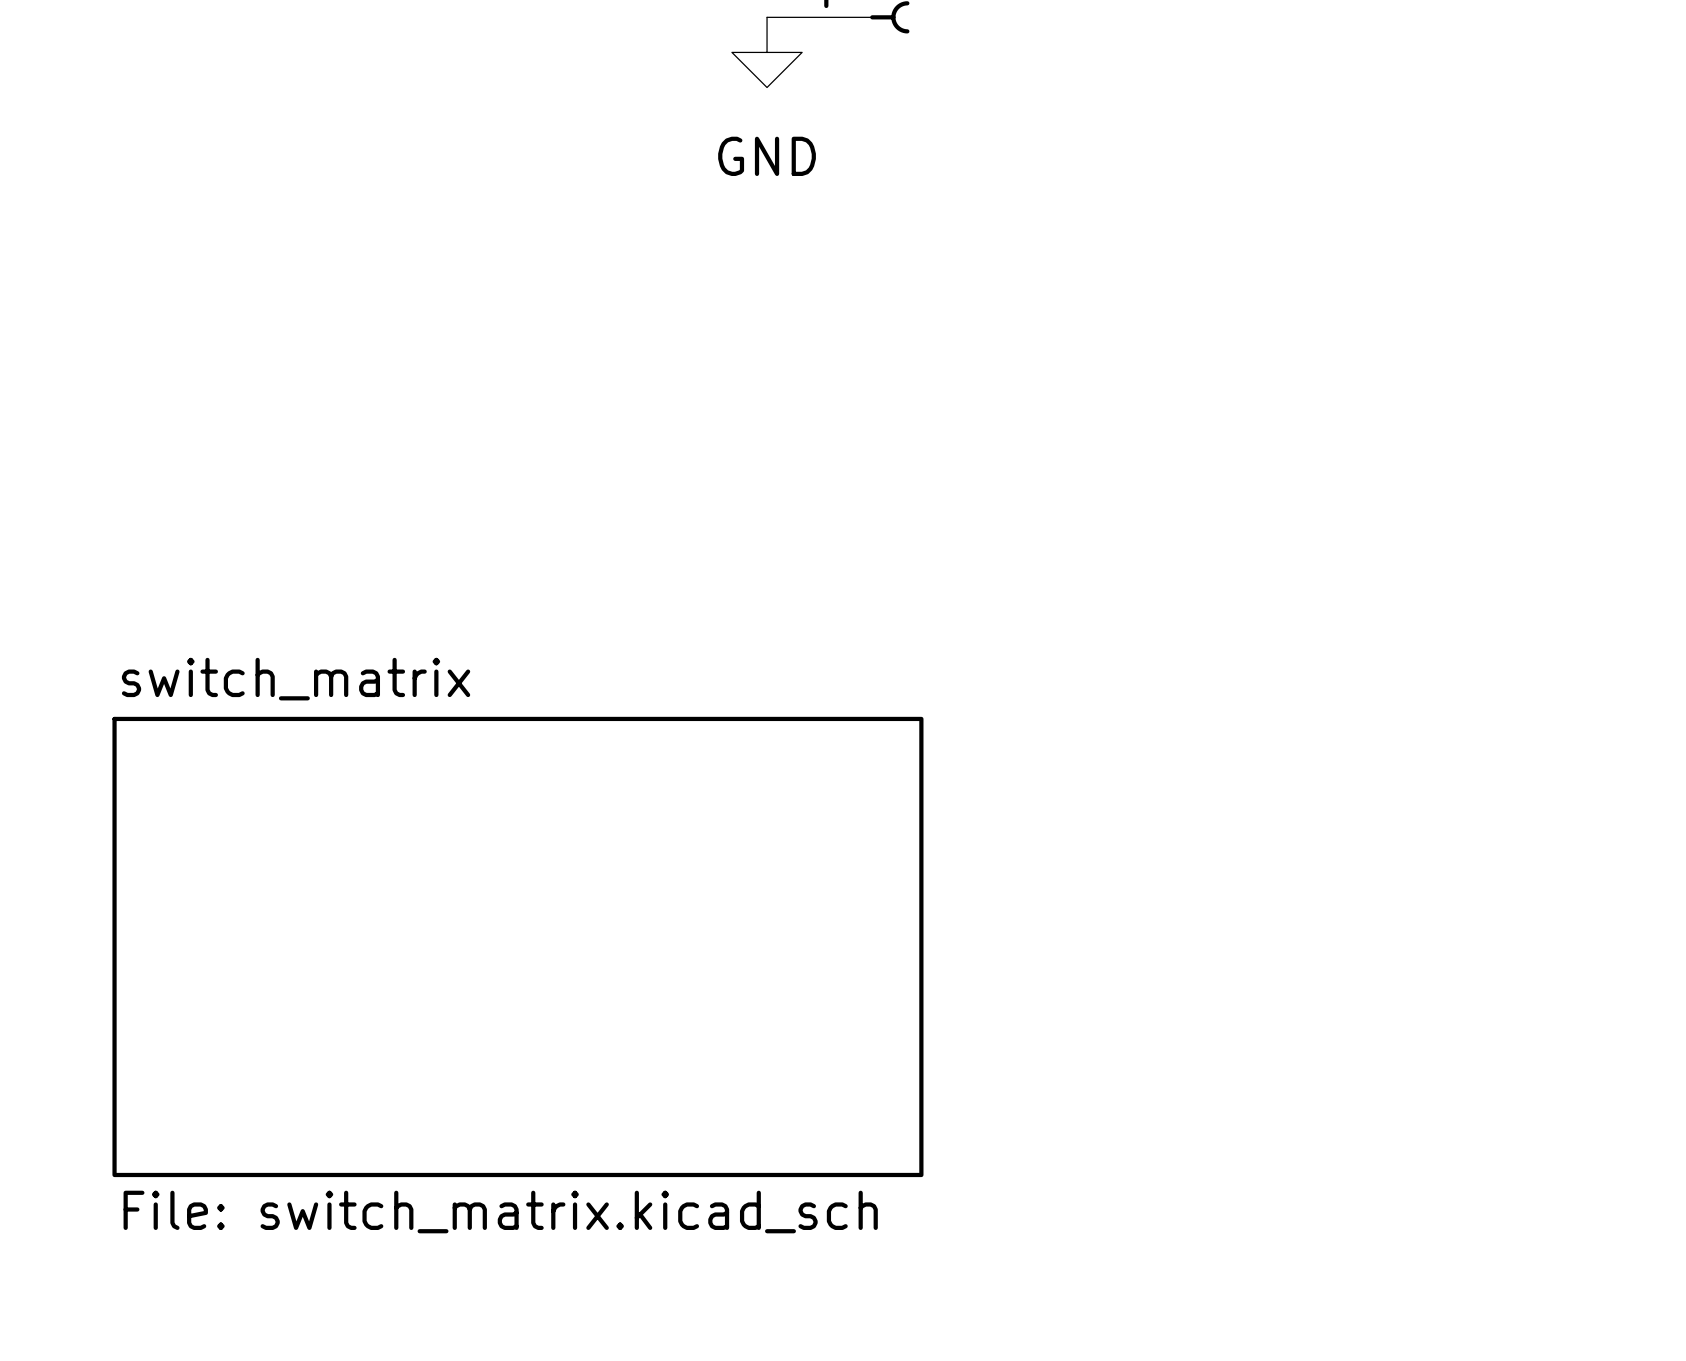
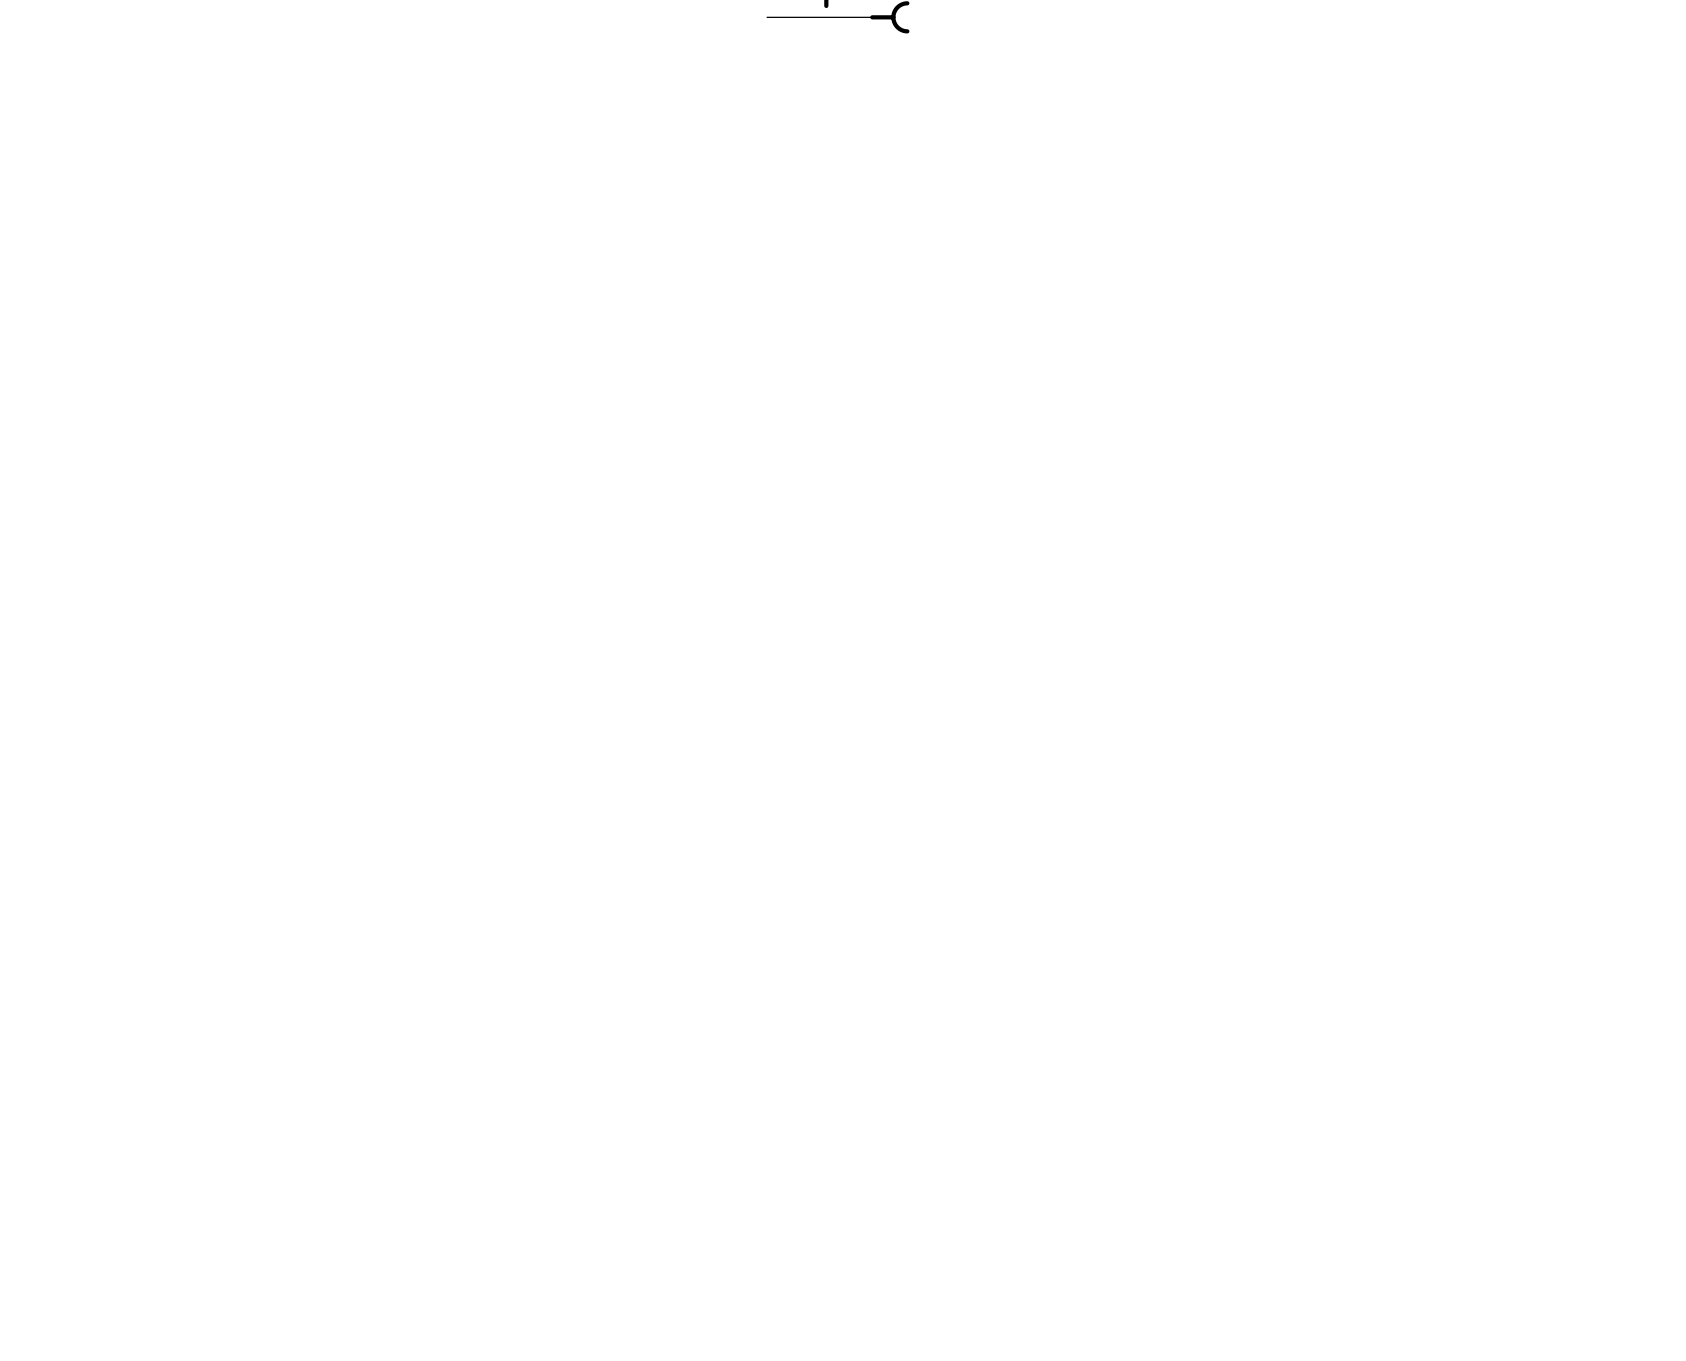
power symbol: GND (767, 52) -> none
sheet switch_matrix: File: switch_matrix.kicad_sch (517, 946) -> none

